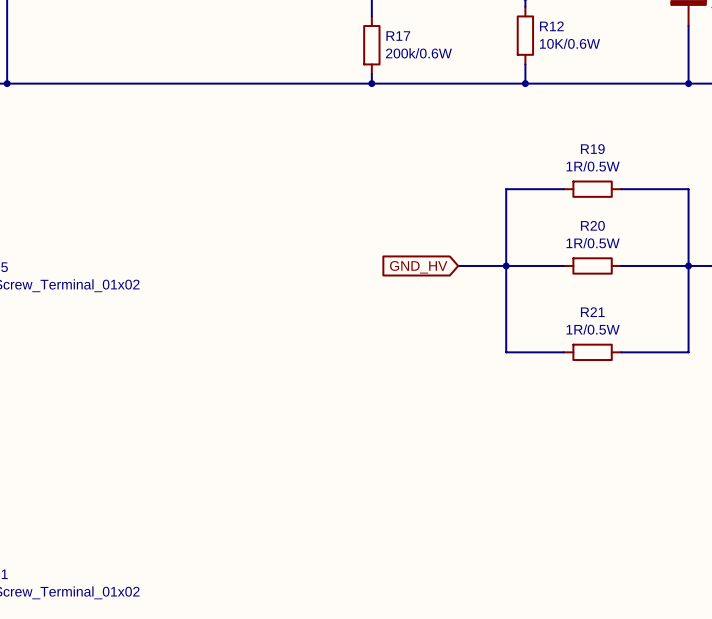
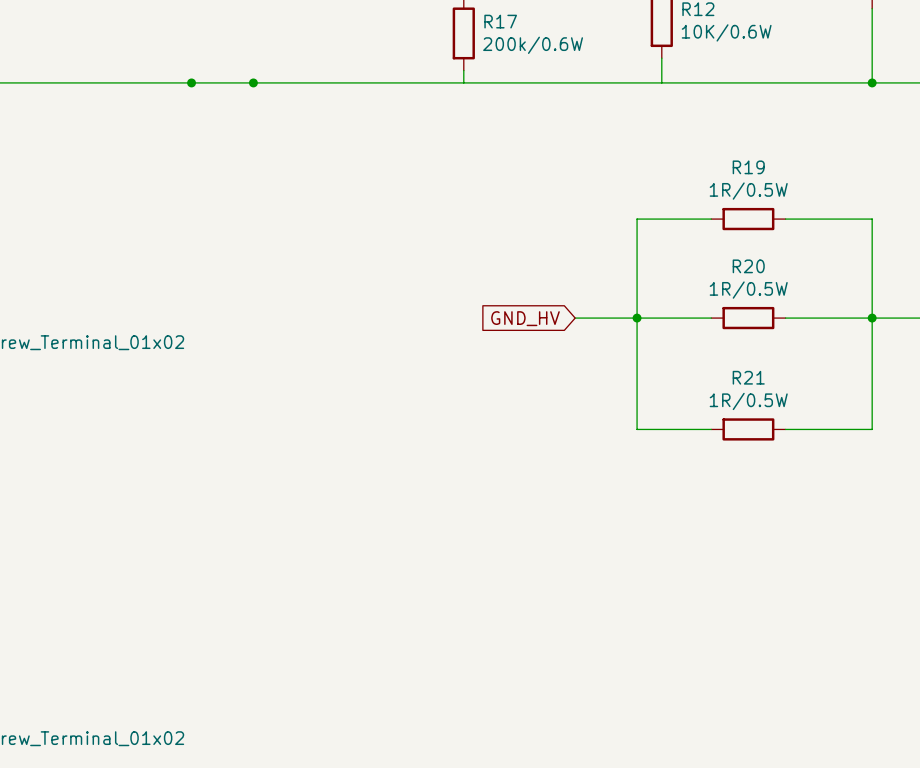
junction: none -> (191, 82)
junction: none -> (253, 82)
junction: (371, 83) -> none
junction: (525, 83) -> none

